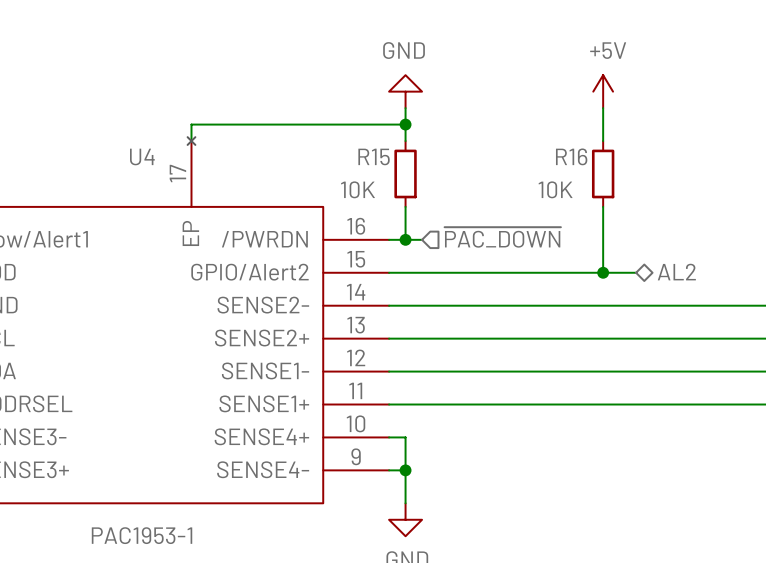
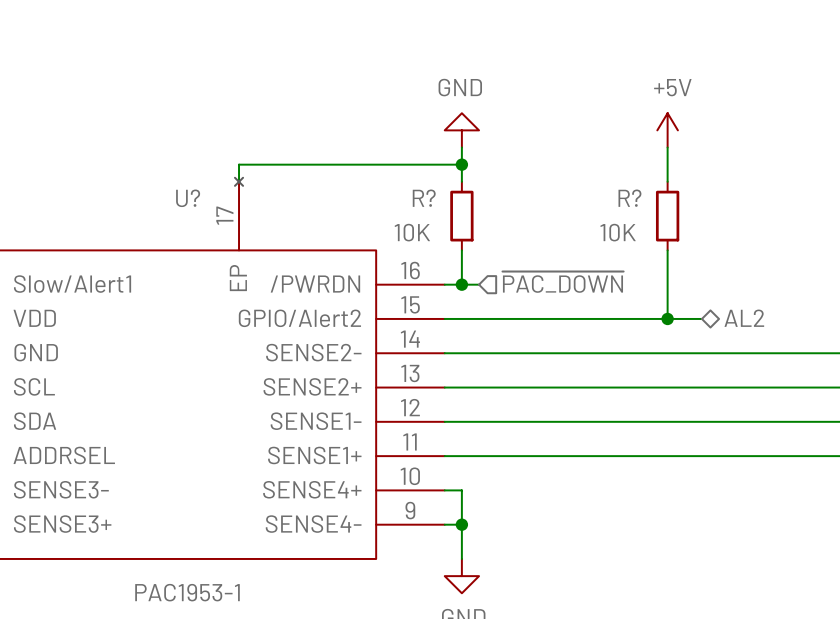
U4 name: U4 (142, 156) -> U? (188, 198)
R15 name: R15 (374, 156) -> R? (424, 198)
R16 name: R16 (571, 156) -> R? (629, 198)

